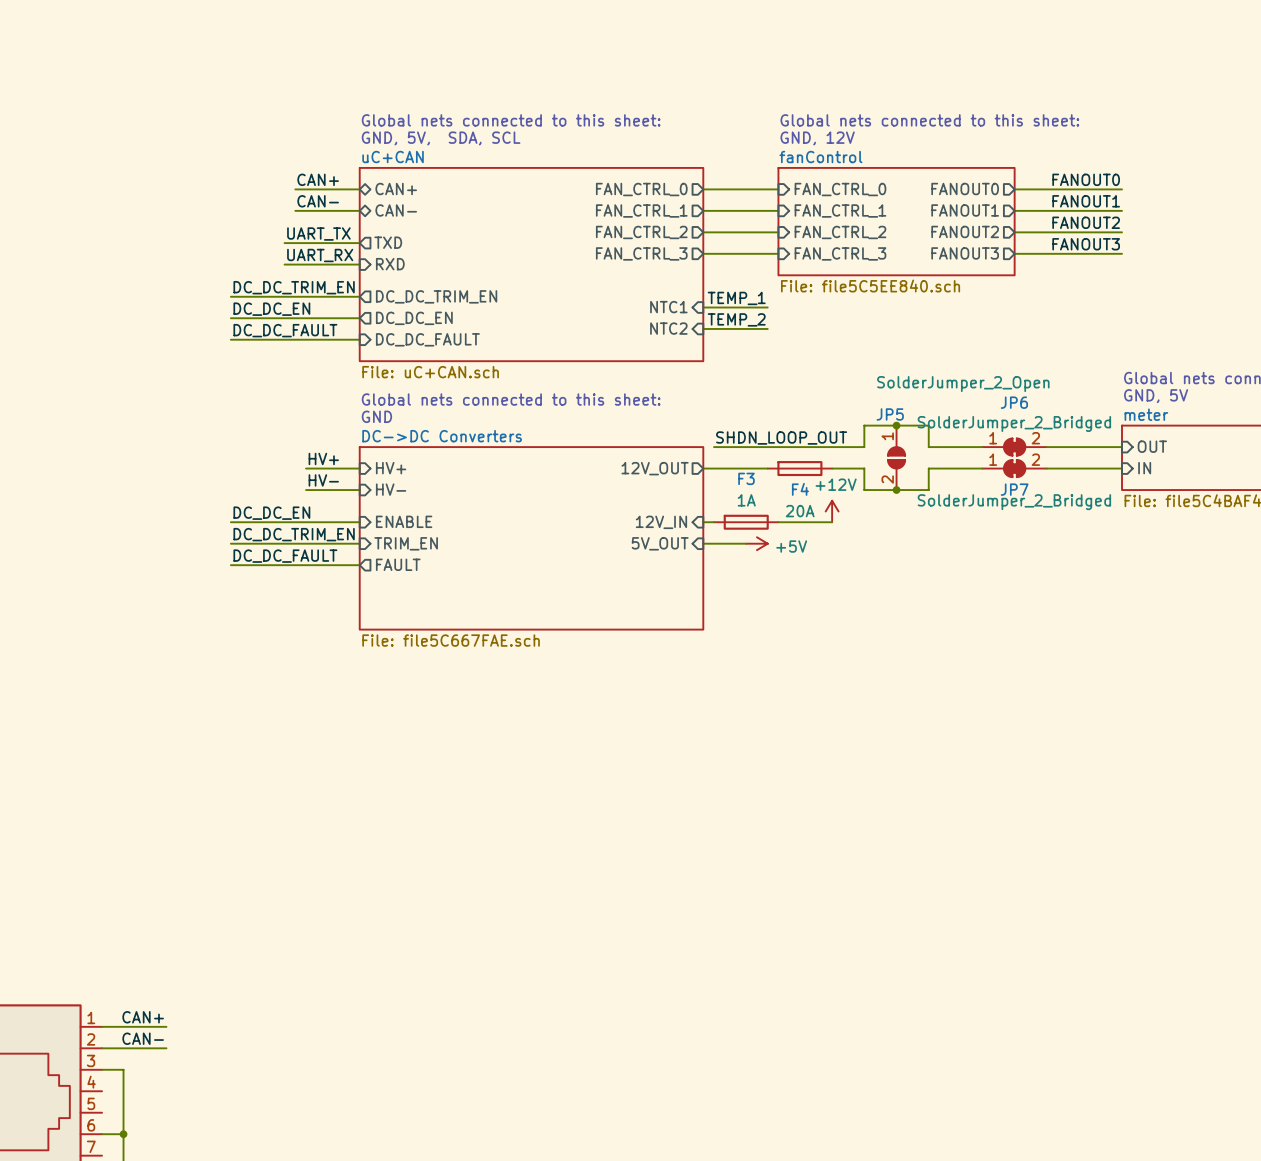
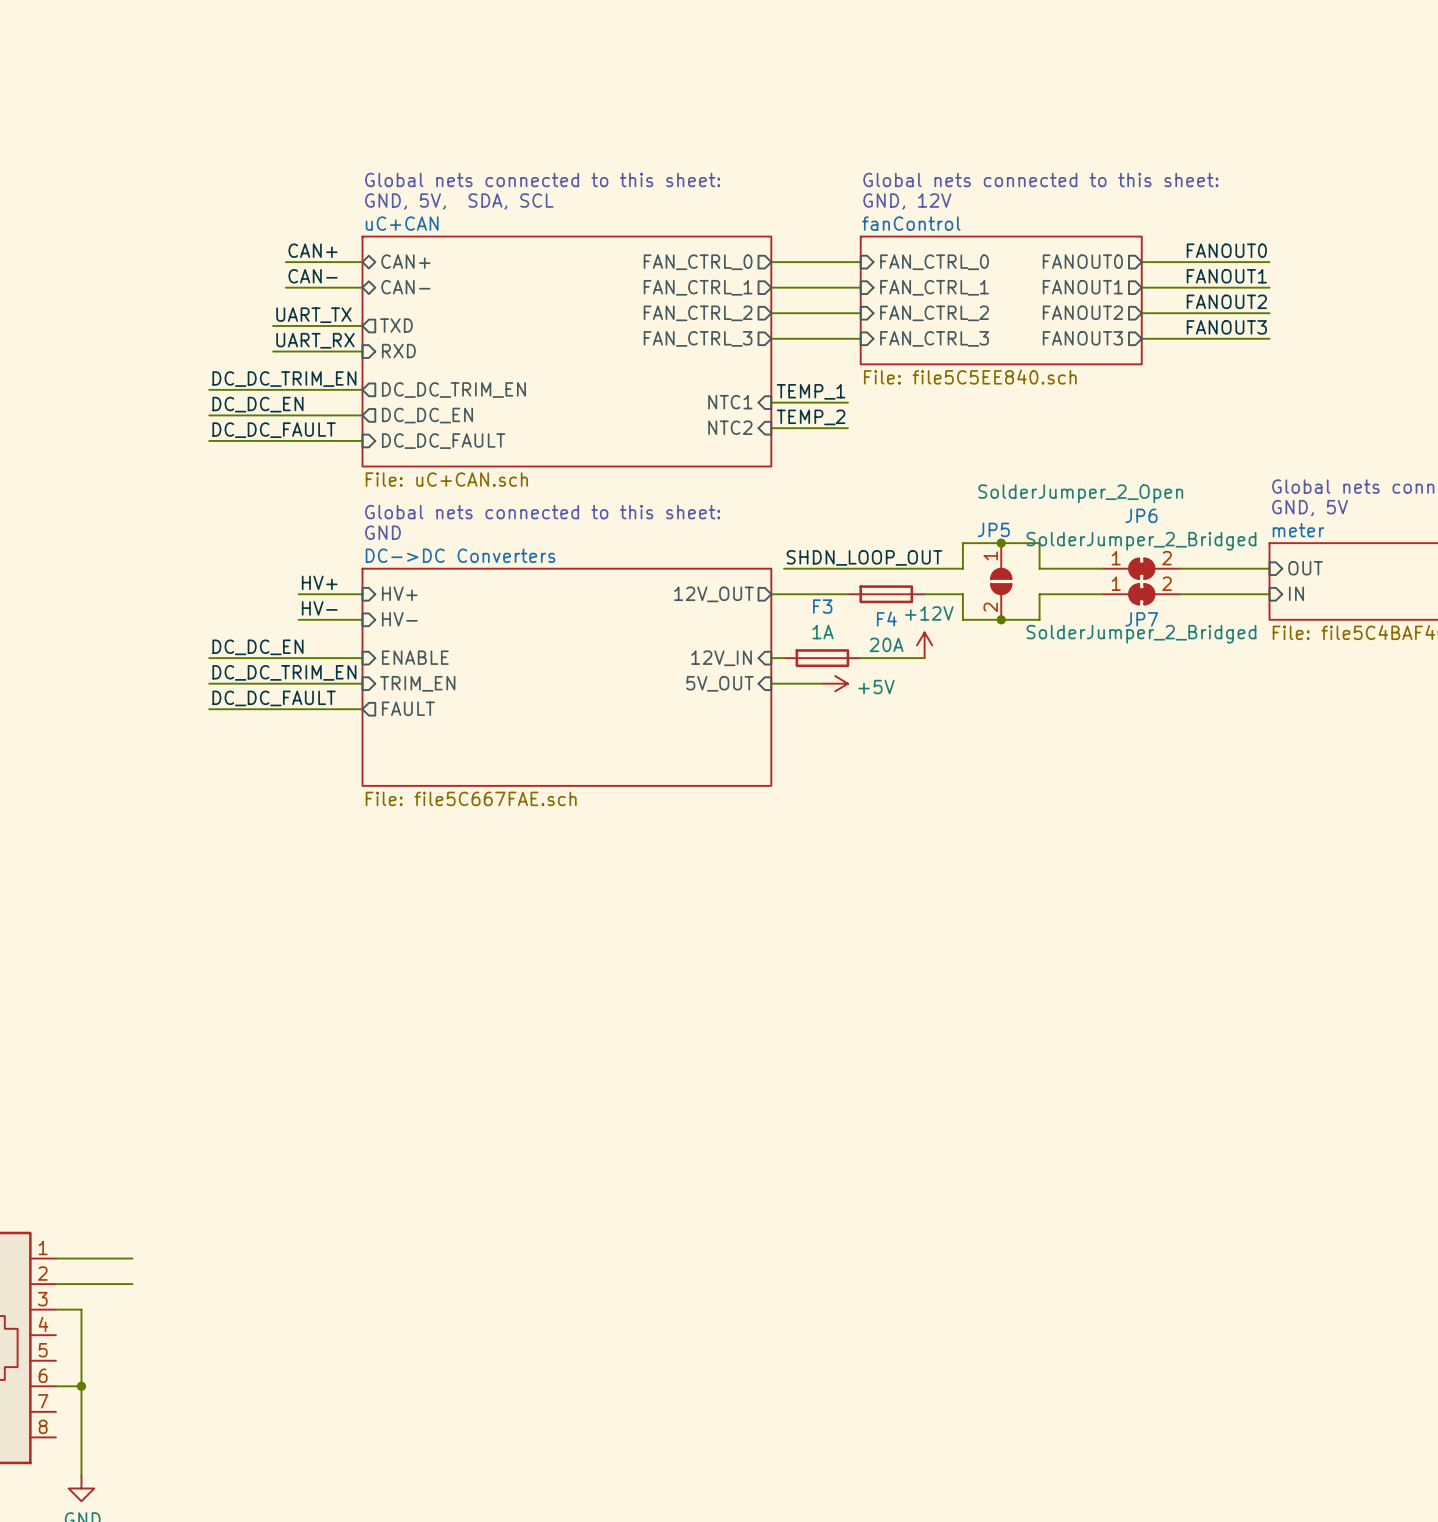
label: CAN+ (143, 1017) -> none
label: CAN- (143, 1038) -> none

